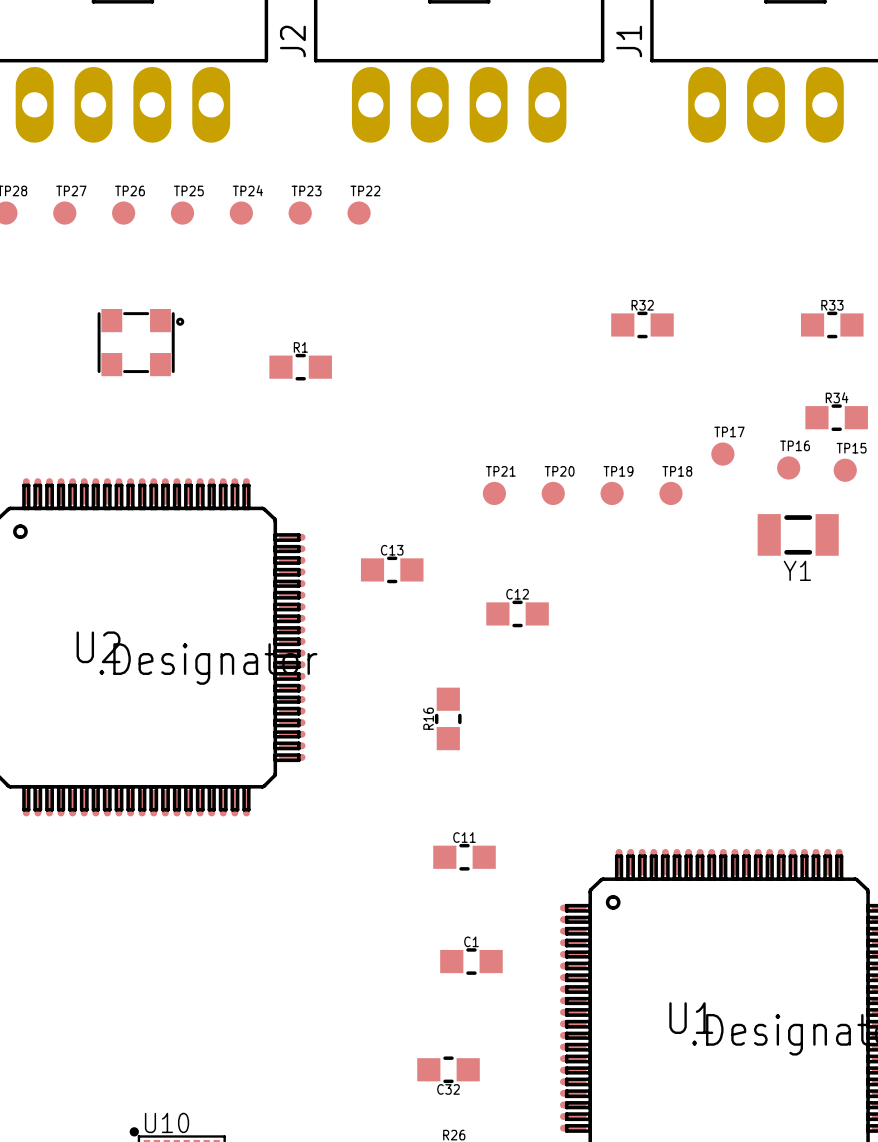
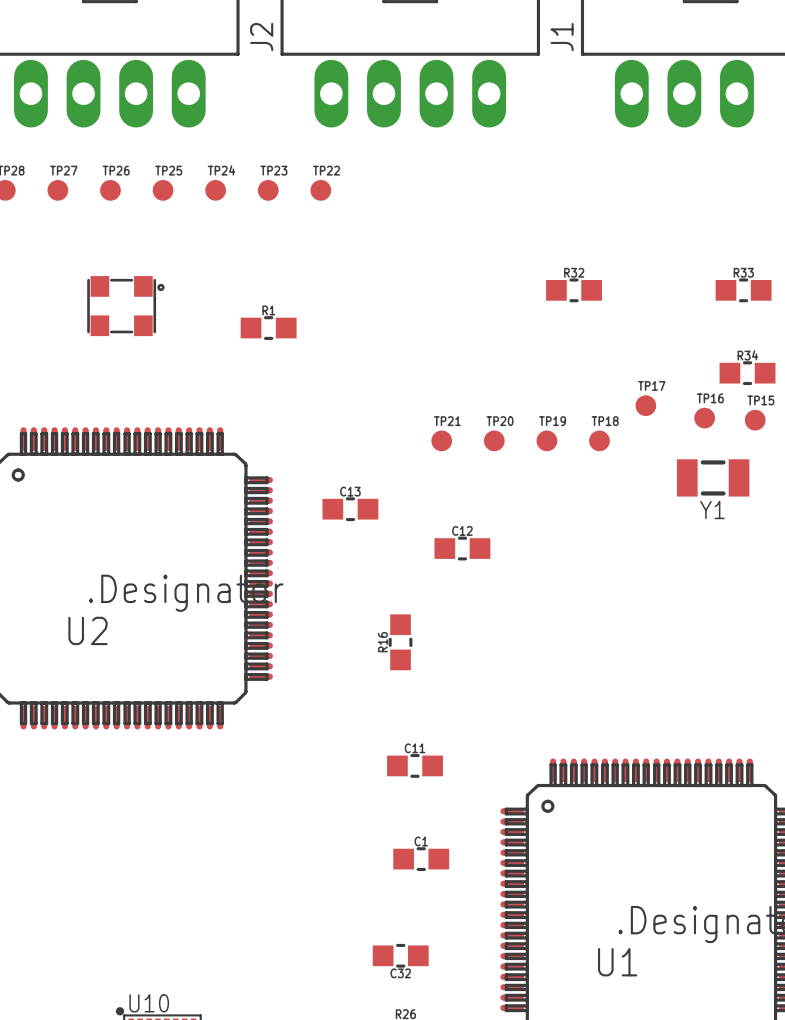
U2 name position: U2 (98, 647) -> U2 (88, 630)
U1 name position: U1 (691, 1018) -> U1 (617, 962)

